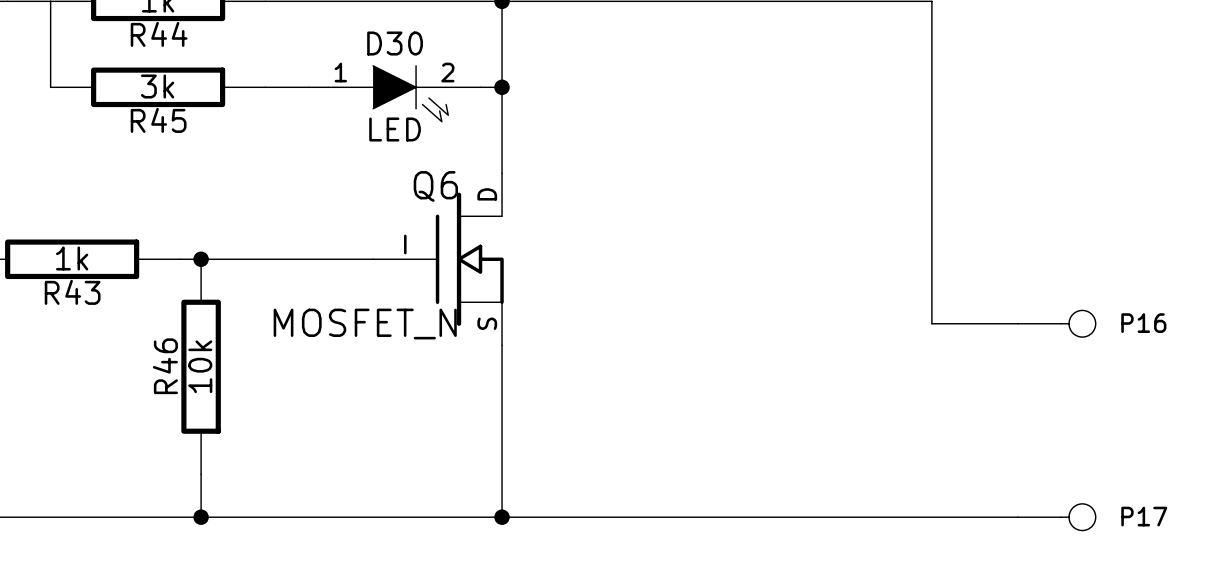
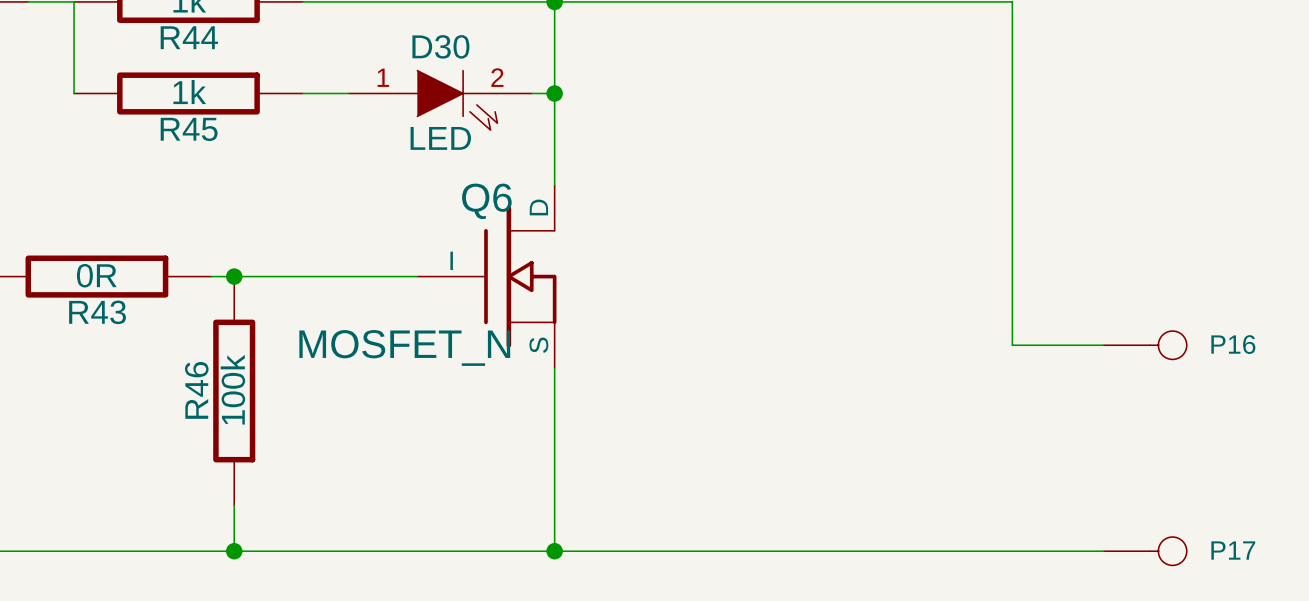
R45 value: 3k (157, 86) -> 1k (189, 92)
R43 value: 1k (72, 258) -> 0R (96, 275)
R46 value: 10k (200, 366) -> 100k (232, 389)

